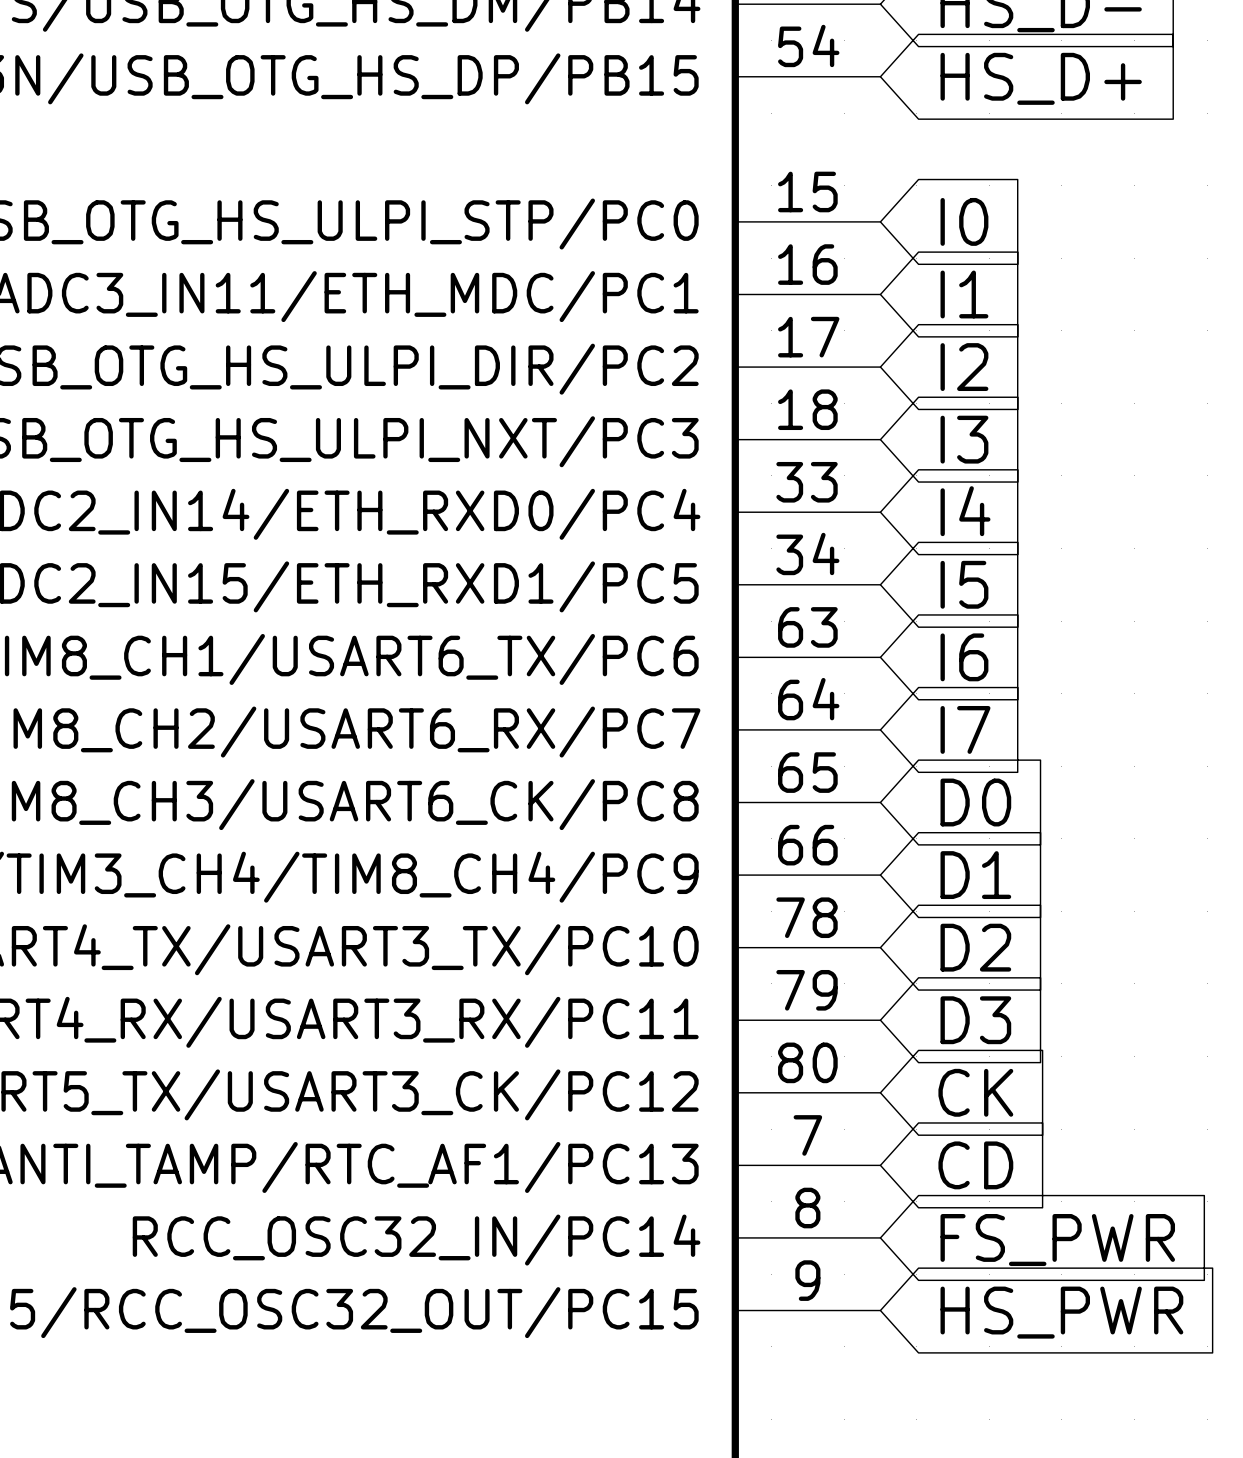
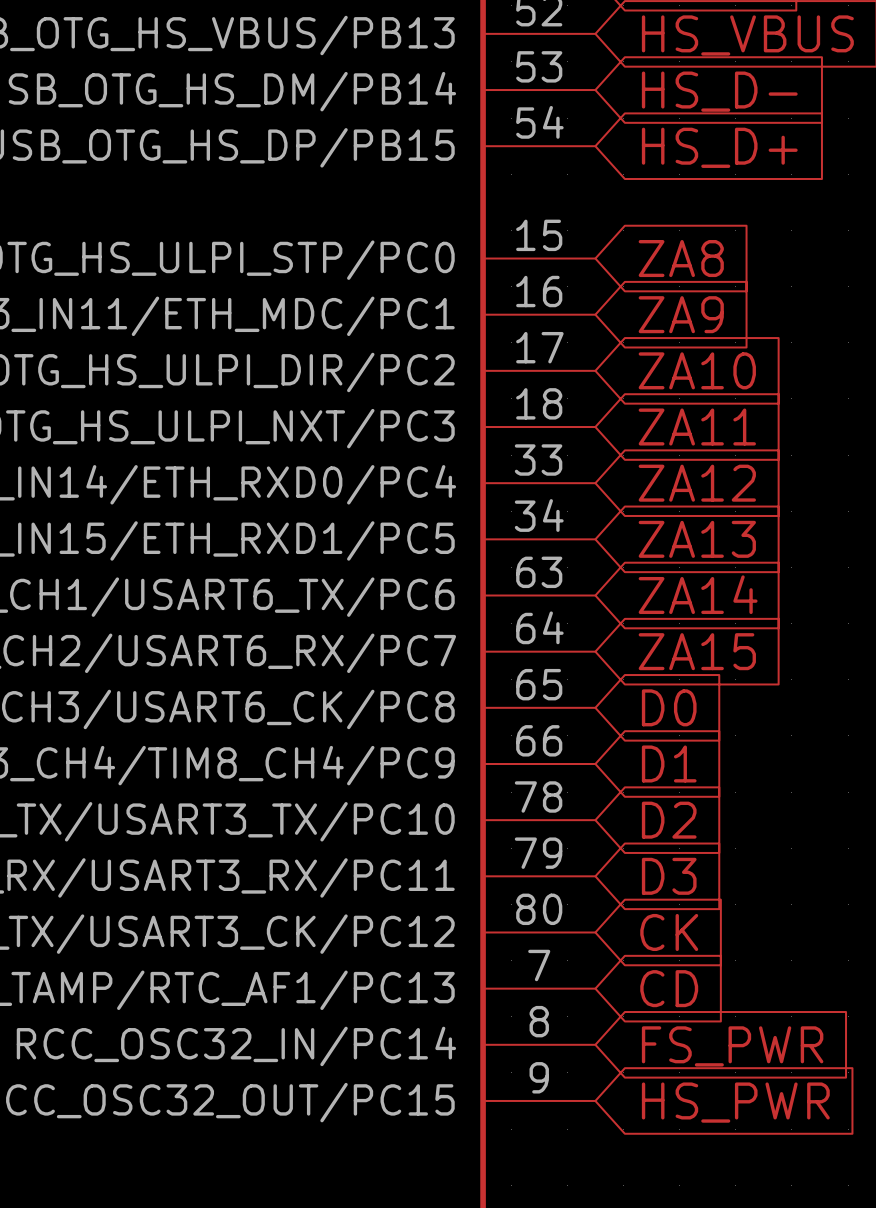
global label: I0 (964, 221) -> ZA8 (681, 258)
global label: I1 (964, 294) -> ZA9 (681, 314)
global label: I2 (964, 367) -> ZA10 (697, 370)
global label: I3 (964, 439) -> ZA11 (697, 427)
global label: I4 (965, 511) -> ZA12 (697, 483)
global label: I5 (964, 584) -> ZA13 (697, 539)
global label: I6 (964, 657) -> ZA14 (698, 594)
global label: I7 (965, 729) -> ZA15 (697, 651)

